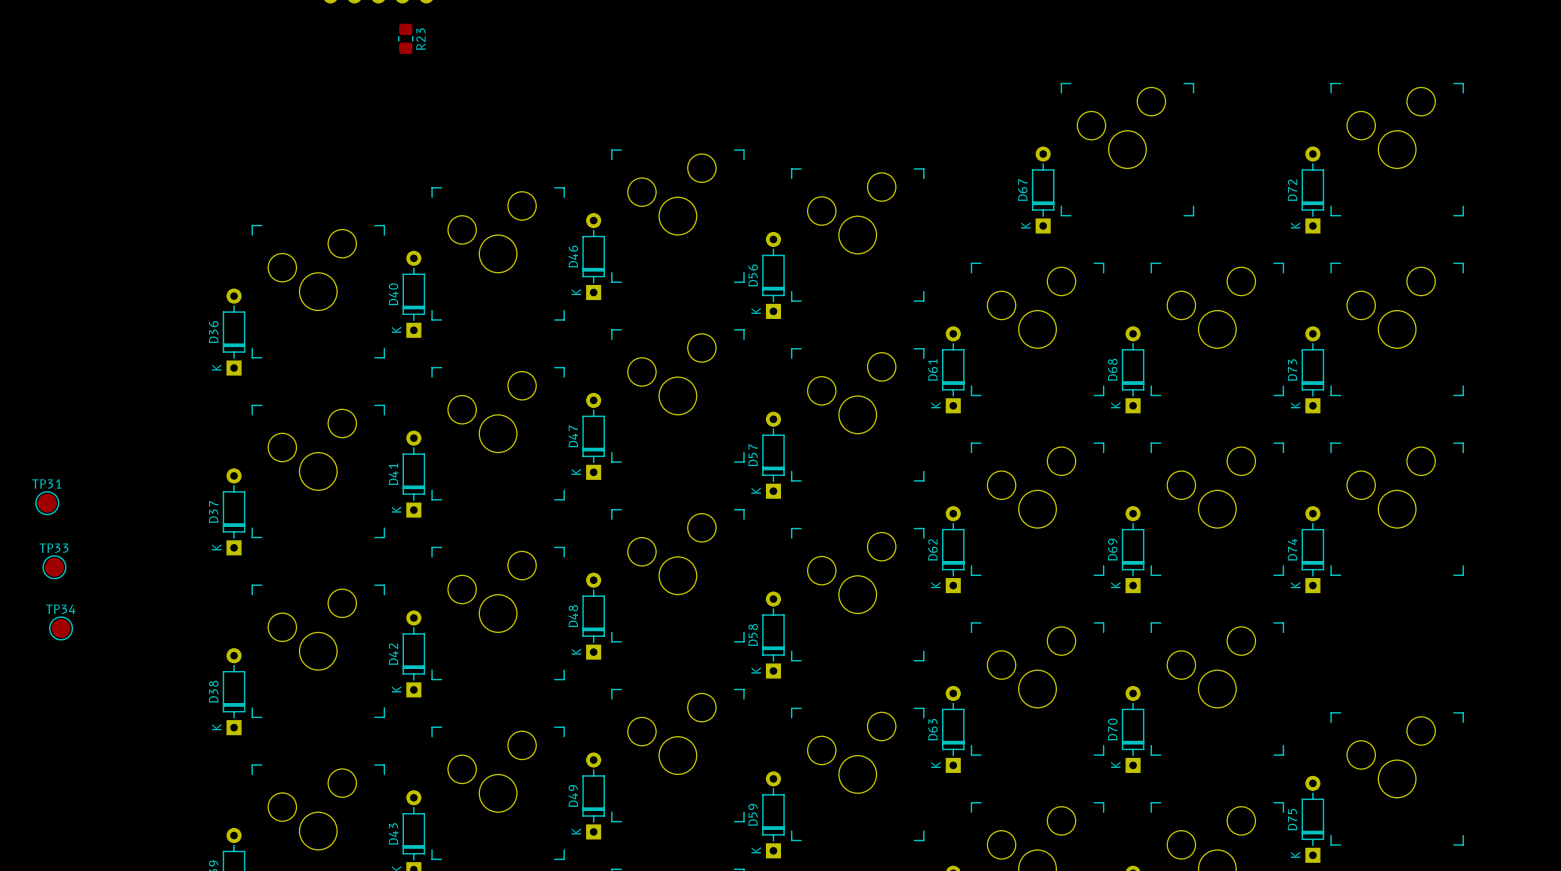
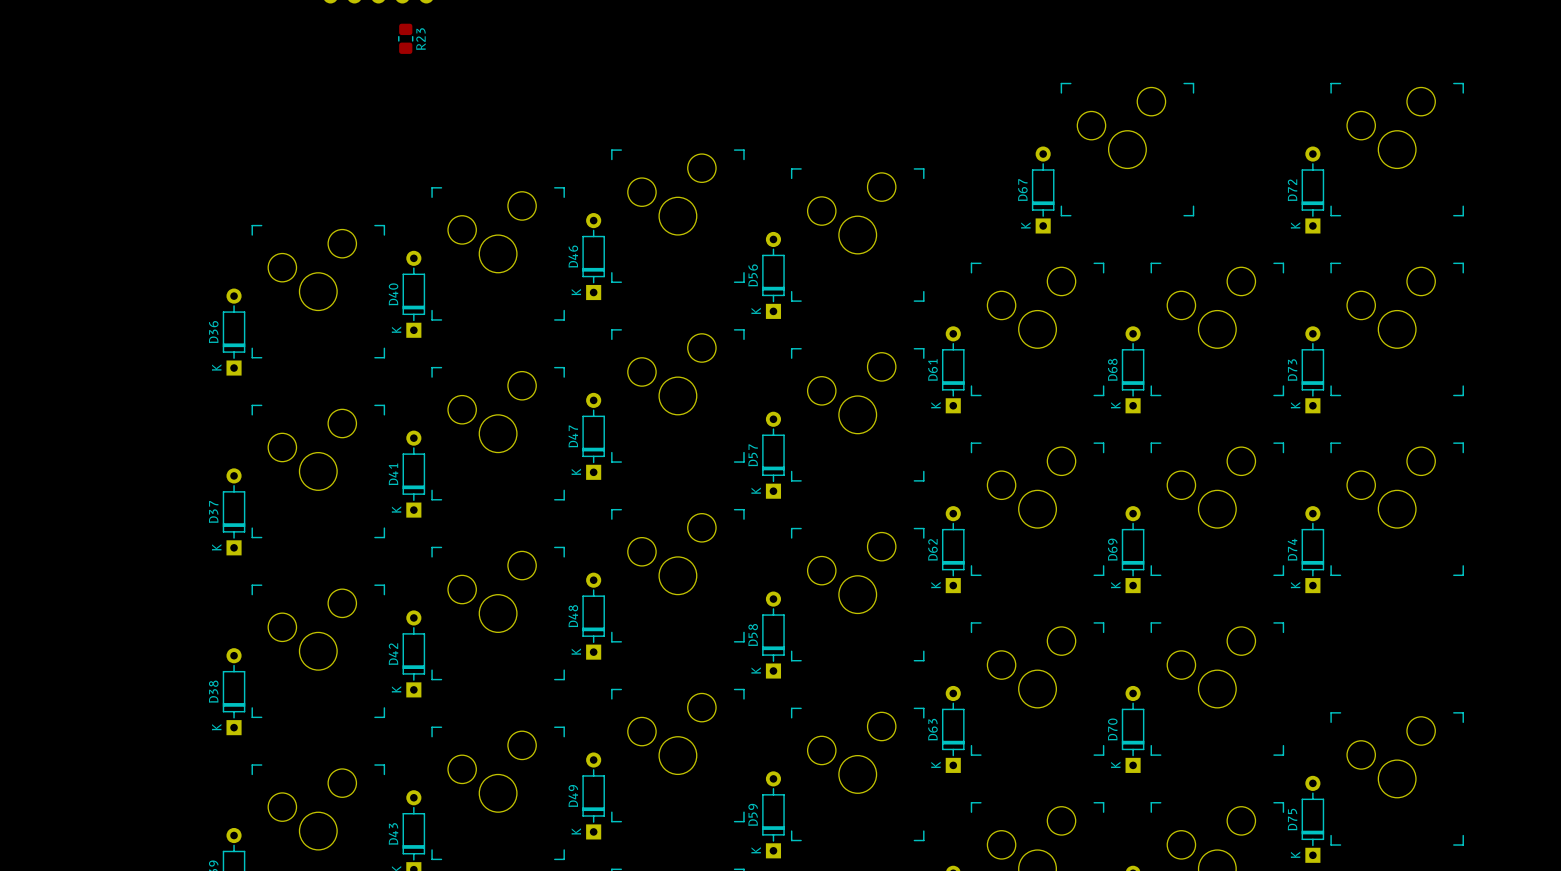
TP31: (47, 503) -> none
TP33: (54, 567) -> none
TP34: (61, 628) -> none

